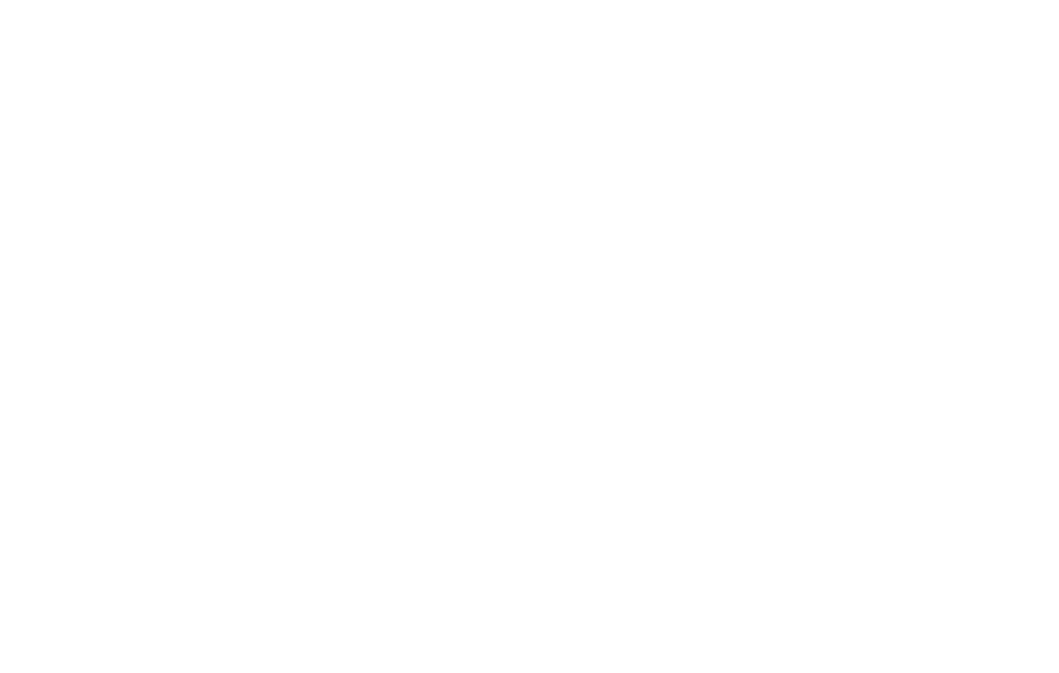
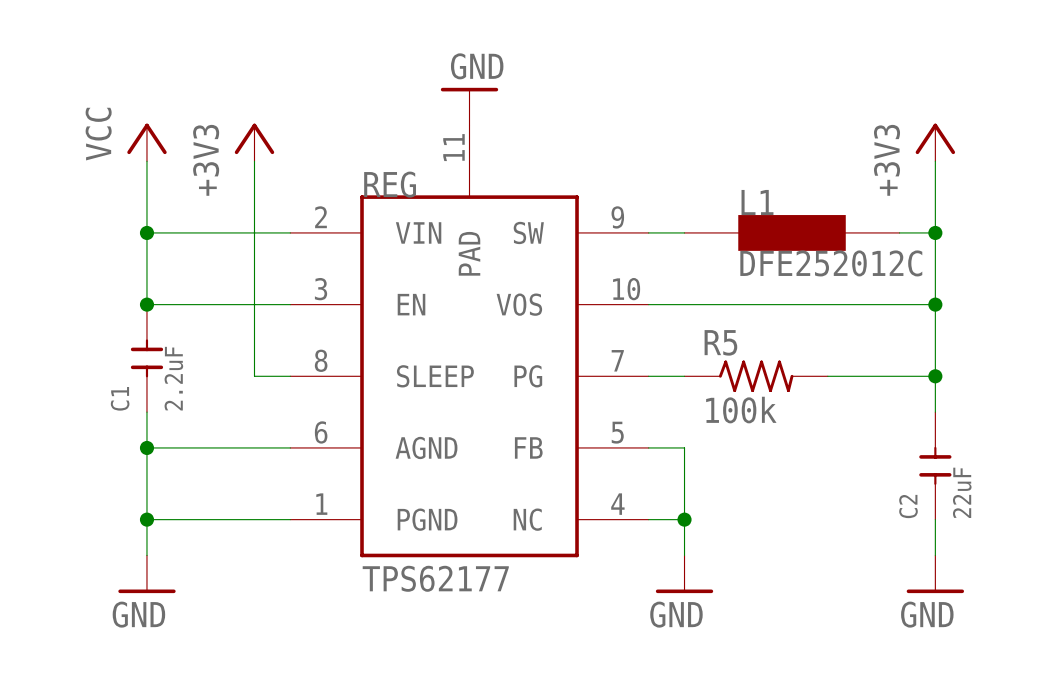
power symbol: none -> GND (469, 106)
power symbol: none -> VCC (146, 142)
power symbol: none -> +3V3 (254, 142)
power symbol: none -> +3V3 (935, 142)
wire: none -> (146, 161) (146, 304) (290, 304)
wire: none -> (254, 161) (254, 376) (290, 376)
wire: none -> (935, 161) (935, 412)
wire: none -> (146, 232) (290, 232)
junction: none -> (146, 232)
wire: none -> (648, 232) (684, 232)
L1: none -> DFE252012C (792, 232)
wire: none -> (899, 232) (935, 232)
junction: none -> (935, 232)
junction: none -> (146, 304)
wire: none -> (648, 304) (935, 304)
junction: none -> (935, 304)
REG: none -> TPS62177 (469, 341)
C1: none -> 2.2uF (146, 358)
wire: none -> (648, 376) (684, 376)
R5: none -> 100k (756, 376)
wire: none -> (827, 376) (935, 376)
junction: none -> (935, 376)
wire: none -> (146, 412) (146, 555)
wire: none -> (146, 447) (290, 447)
junction: none -> (146, 447)
wire: none -> (648, 447) (684, 447) (684, 555)
C2: none -> 22uF (935, 465)
wire: none -> (146, 519) (290, 519)
junction: none -> (146, 519)
wire: none -> (648, 519) (684, 519)
junction: none -> (684, 519)
wire: none -> (935, 519) (935, 555)
power symbol: none -> GND (146, 574)
power symbol: none -> GND (684, 574)
power symbol: none -> GND (935, 574)

